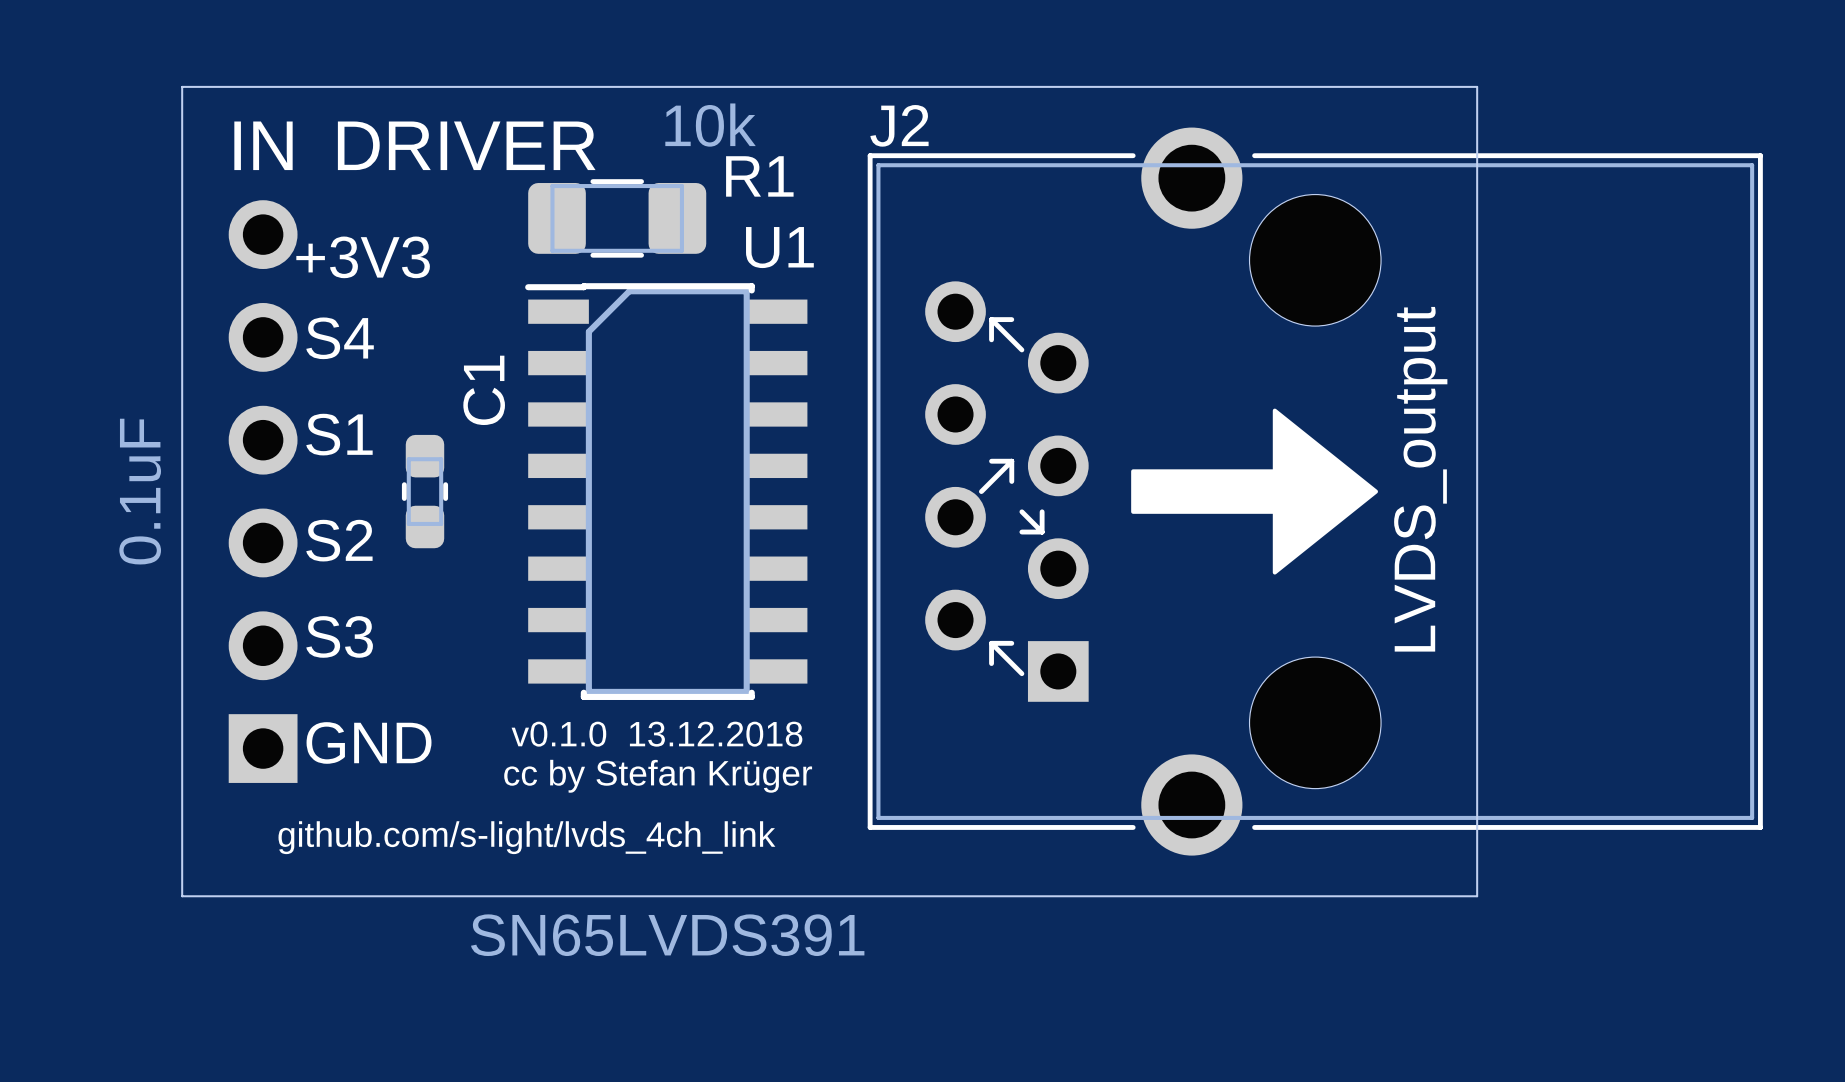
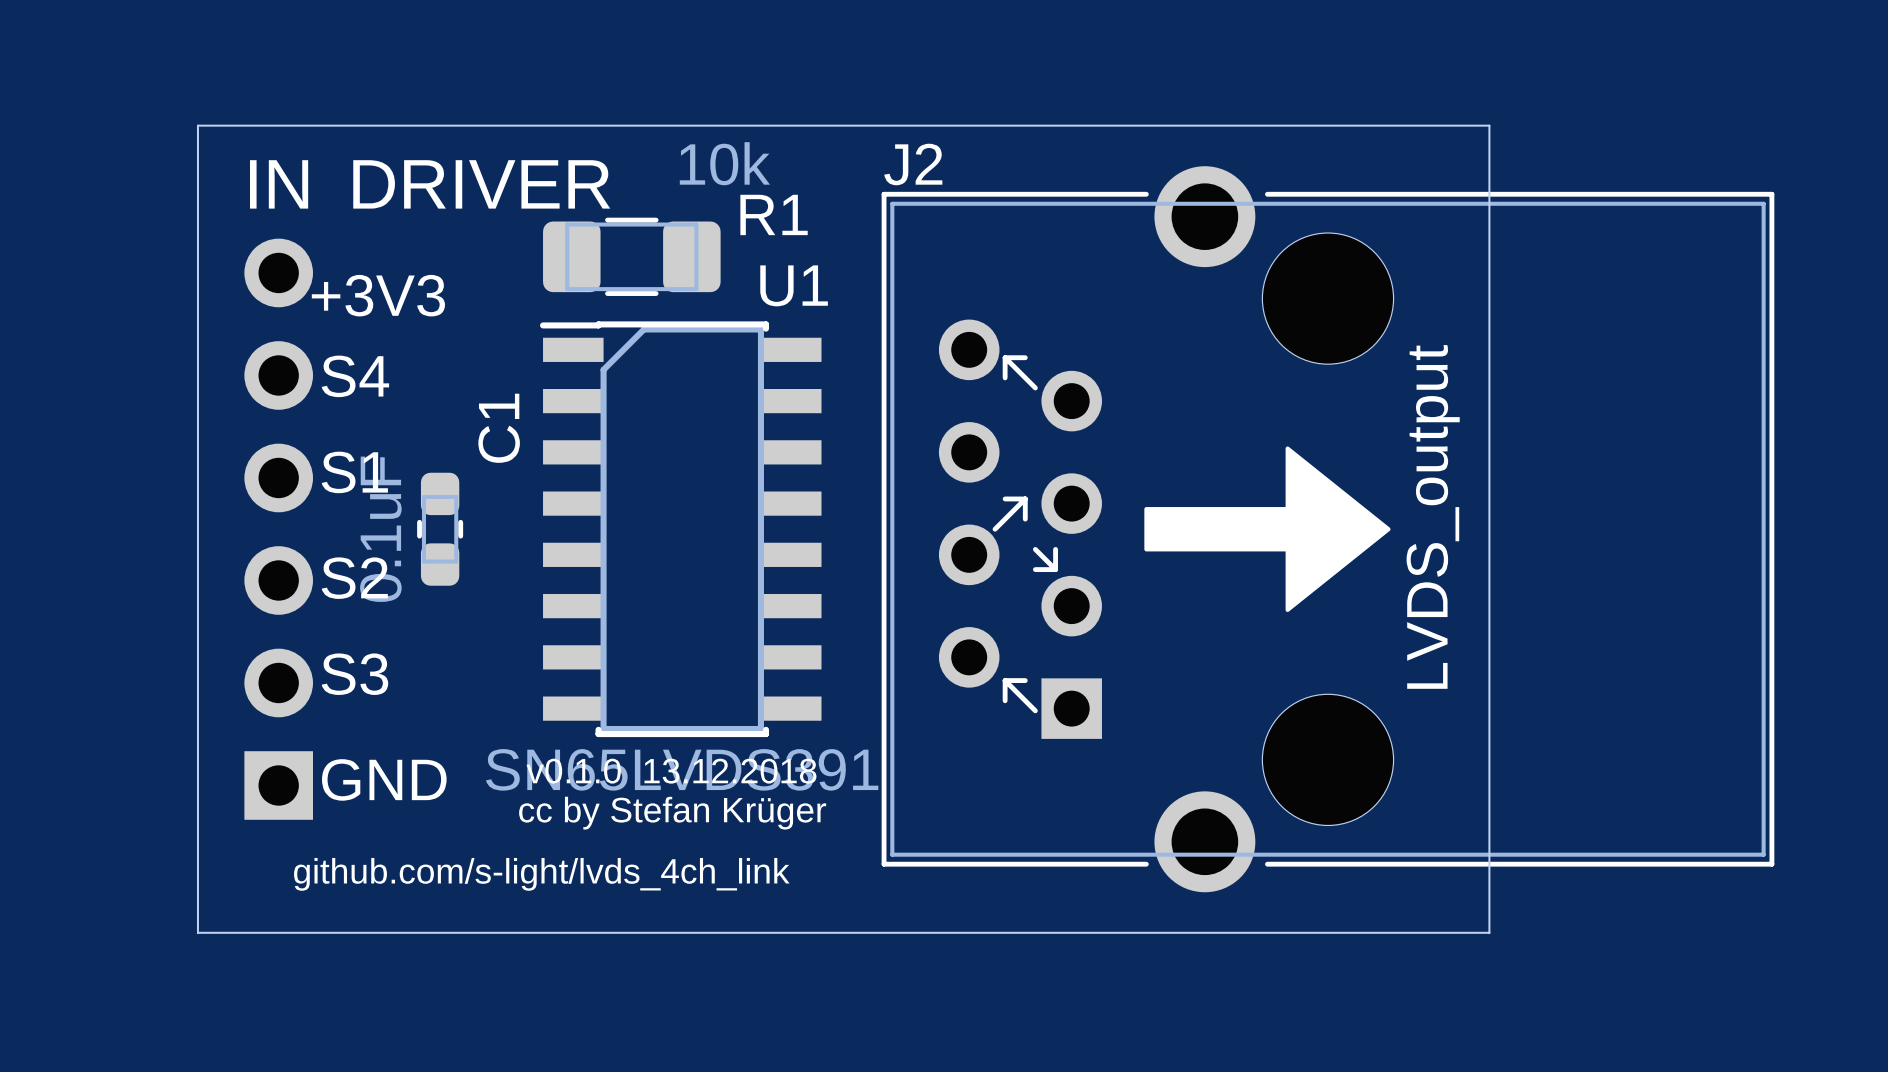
C1 value position: 0.1uF (140, 491) -> 0.1uF (380, 529)
U1 value position: SN65LVDS391 (667, 935) -> SN65LVDS391 (682, 769)

